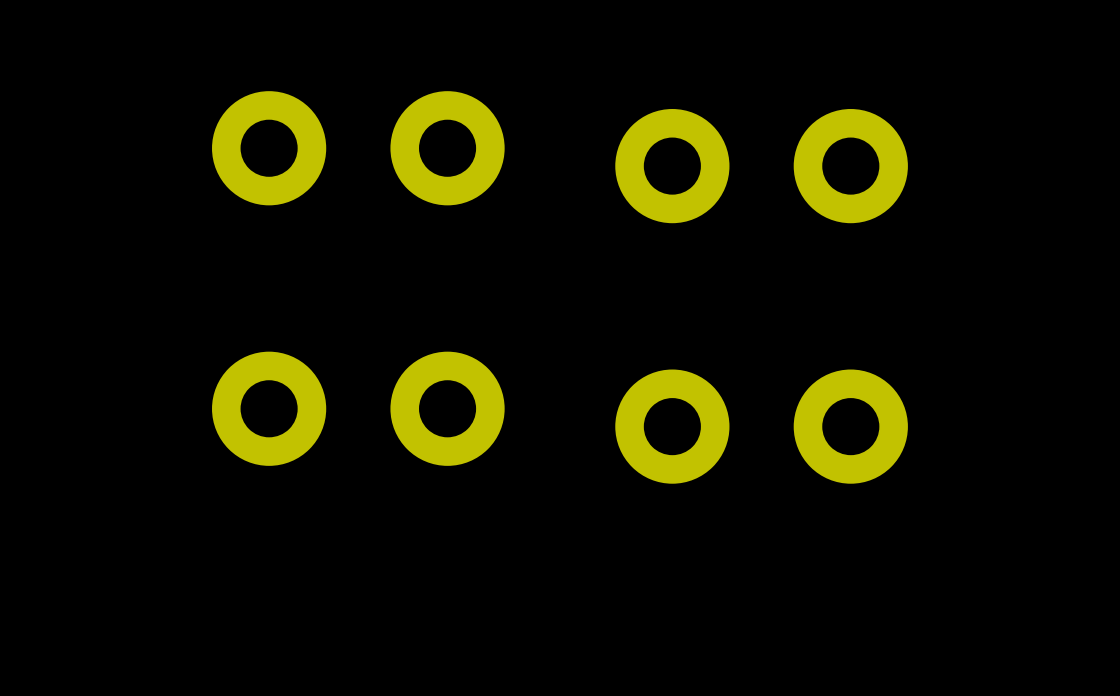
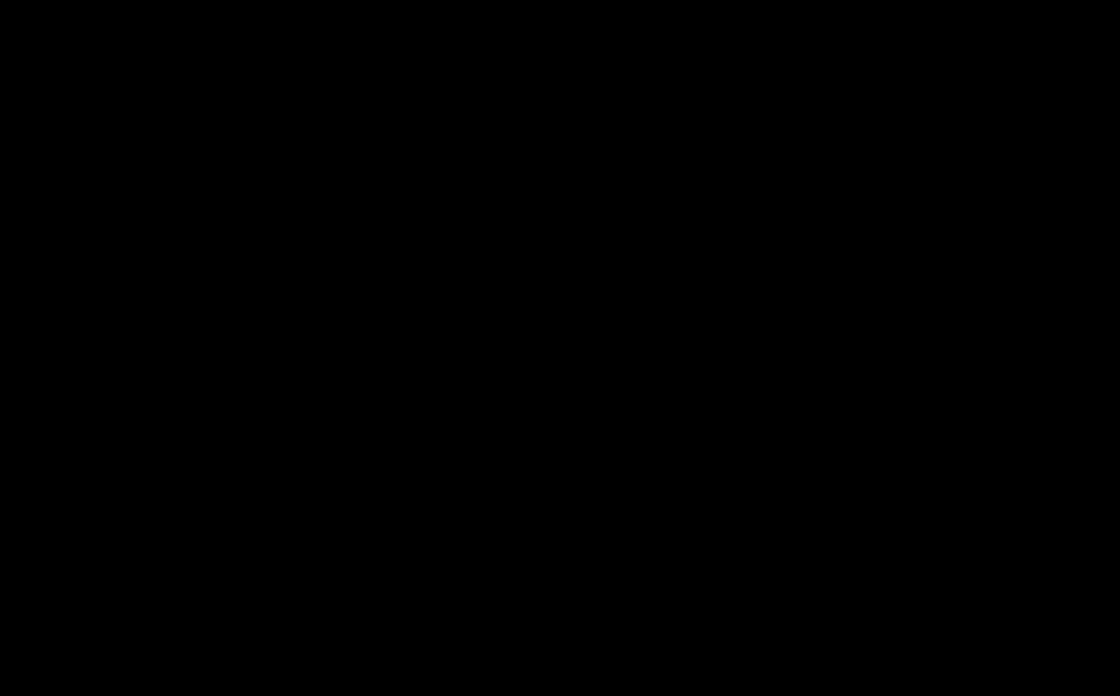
part: (358, 148) -> none
part: (761, 166) -> none
part: (358, 408) -> none
part: (761, 426) -> none

